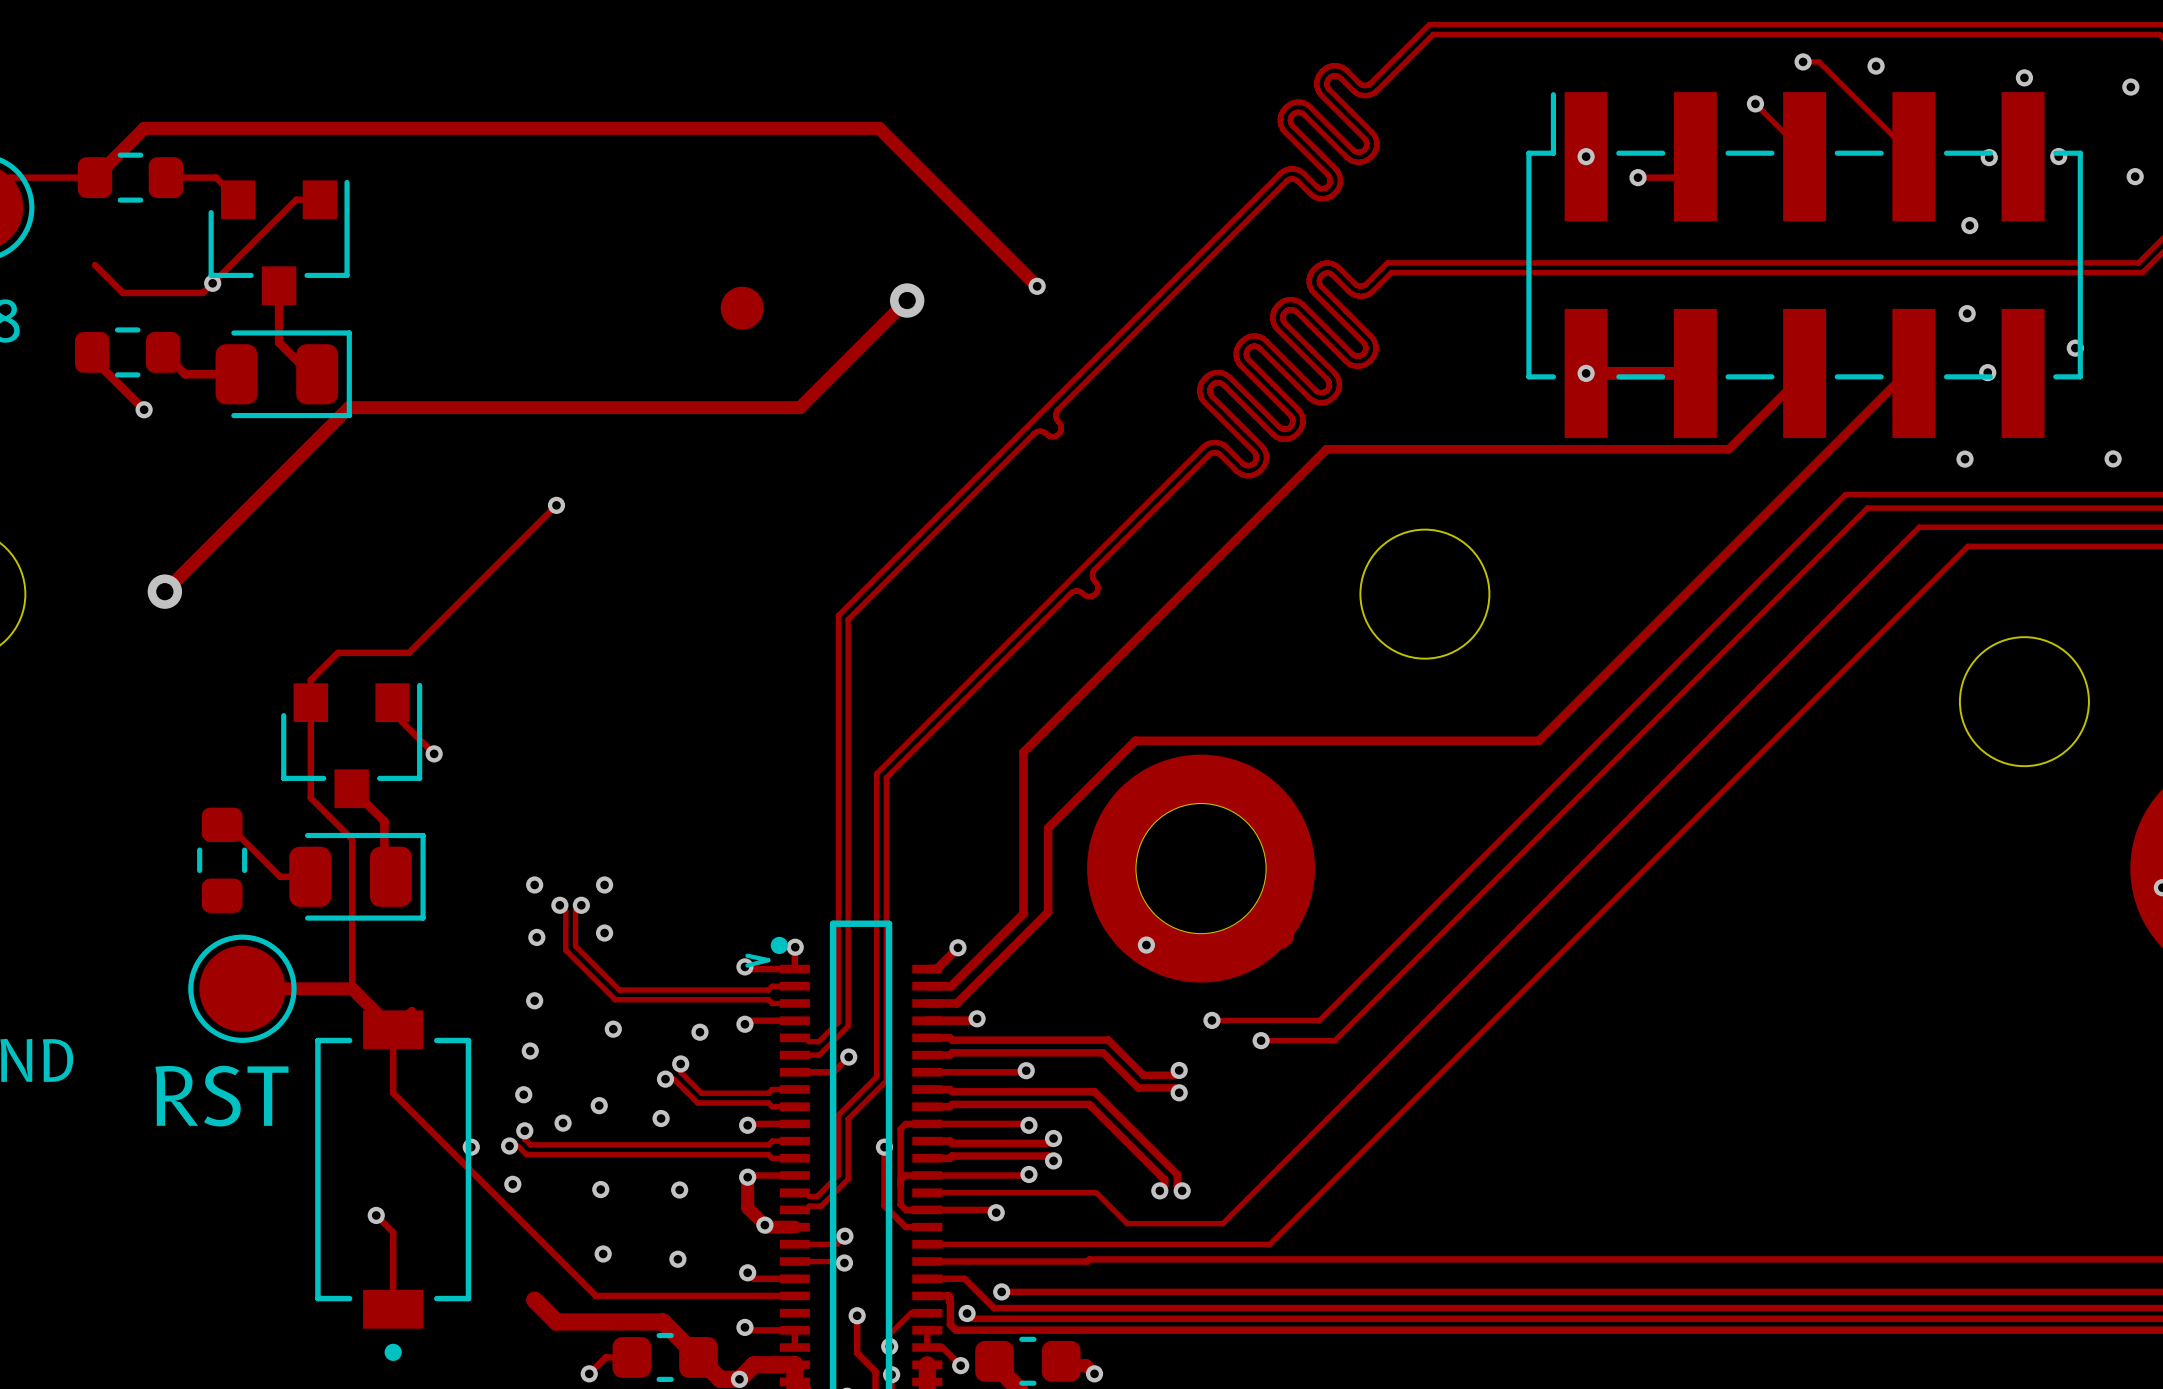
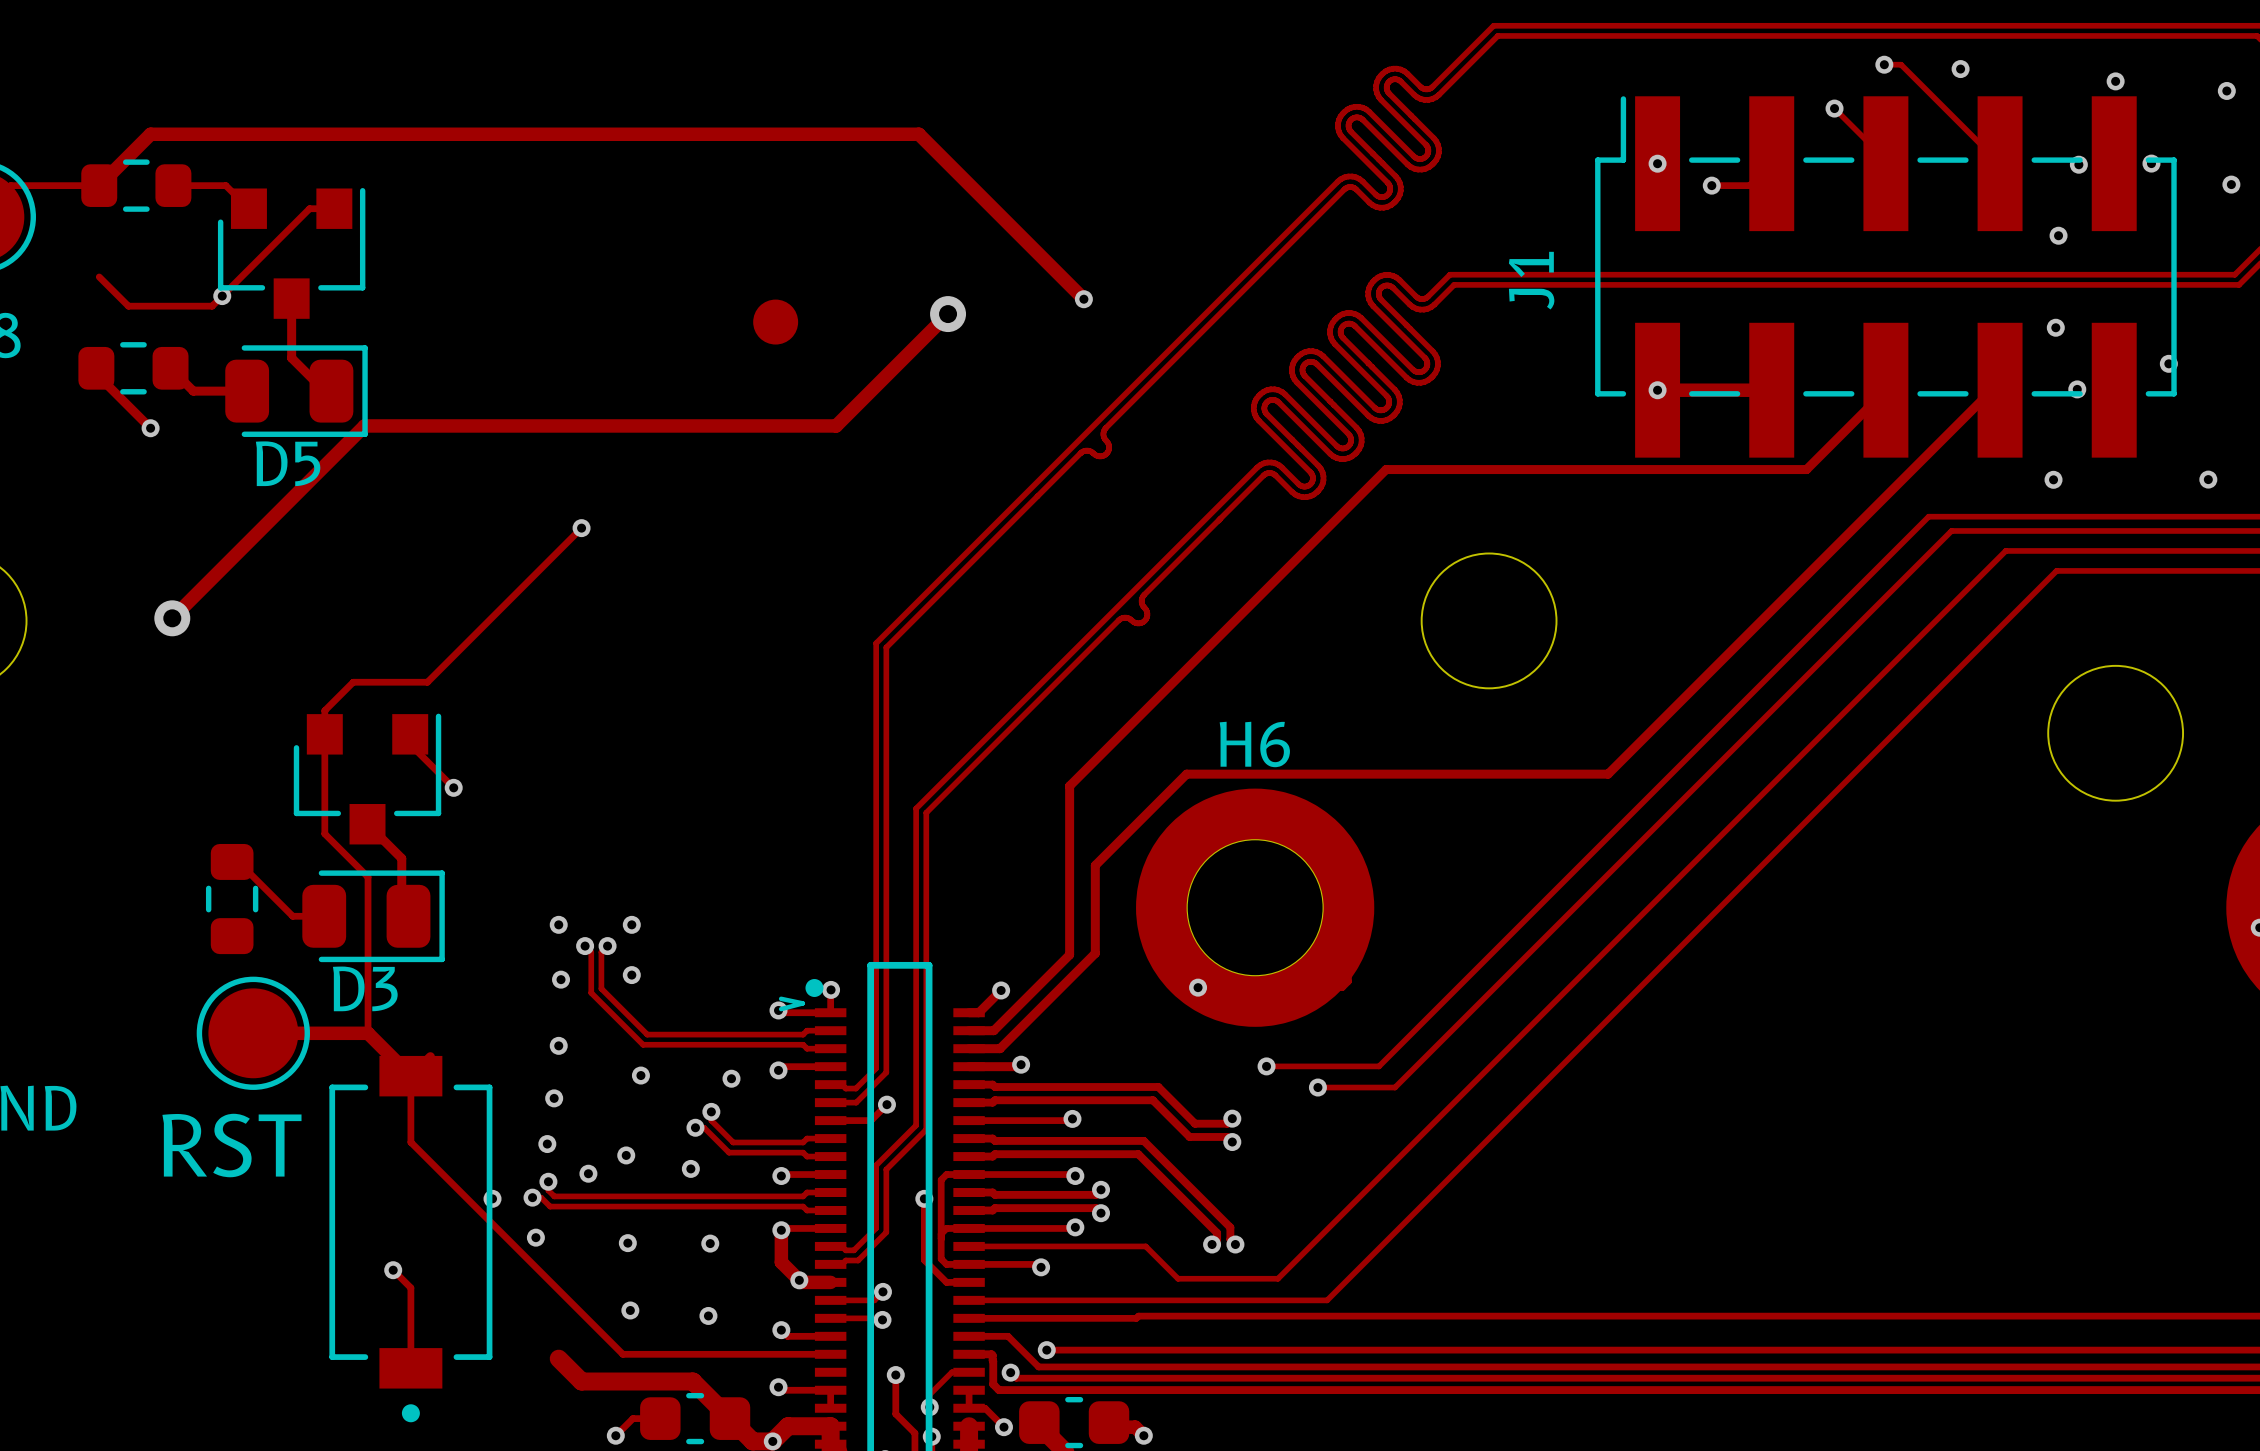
J1 name: none -> J1 (1531, 280)
D5 name: none -> D5 (288, 463)
H6 name: none -> H6 (1254, 744)
D3 name: none -> D3 (365, 988)

